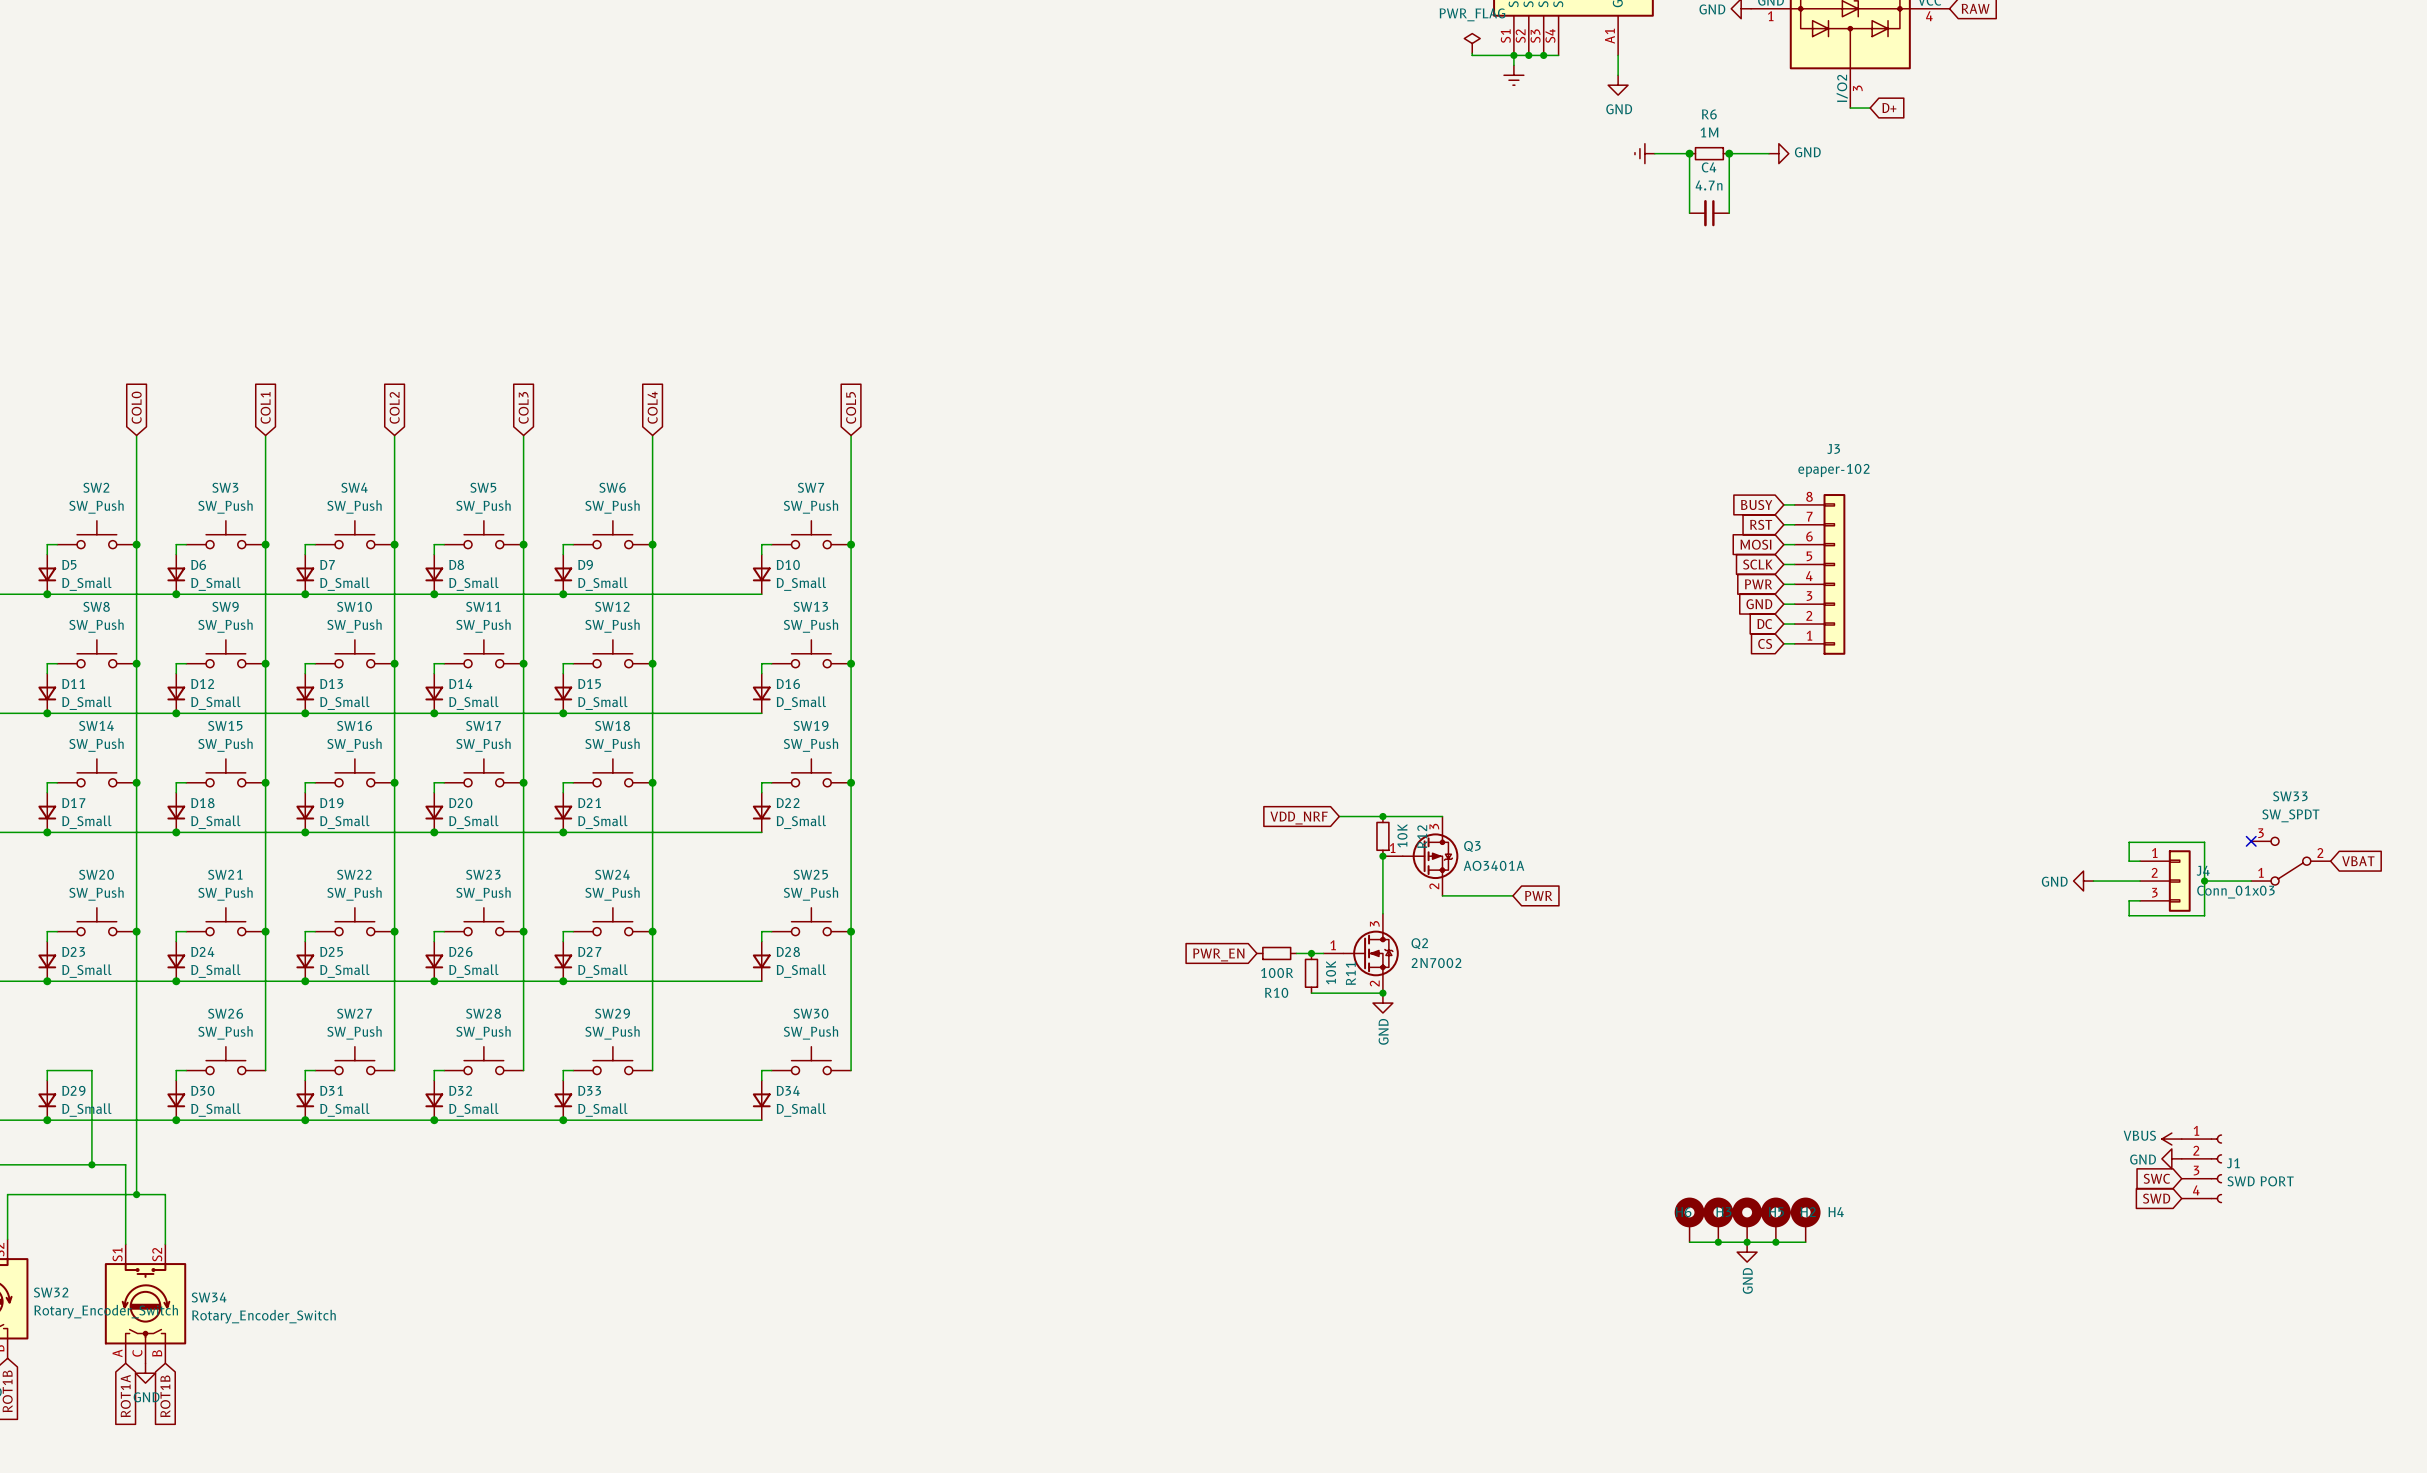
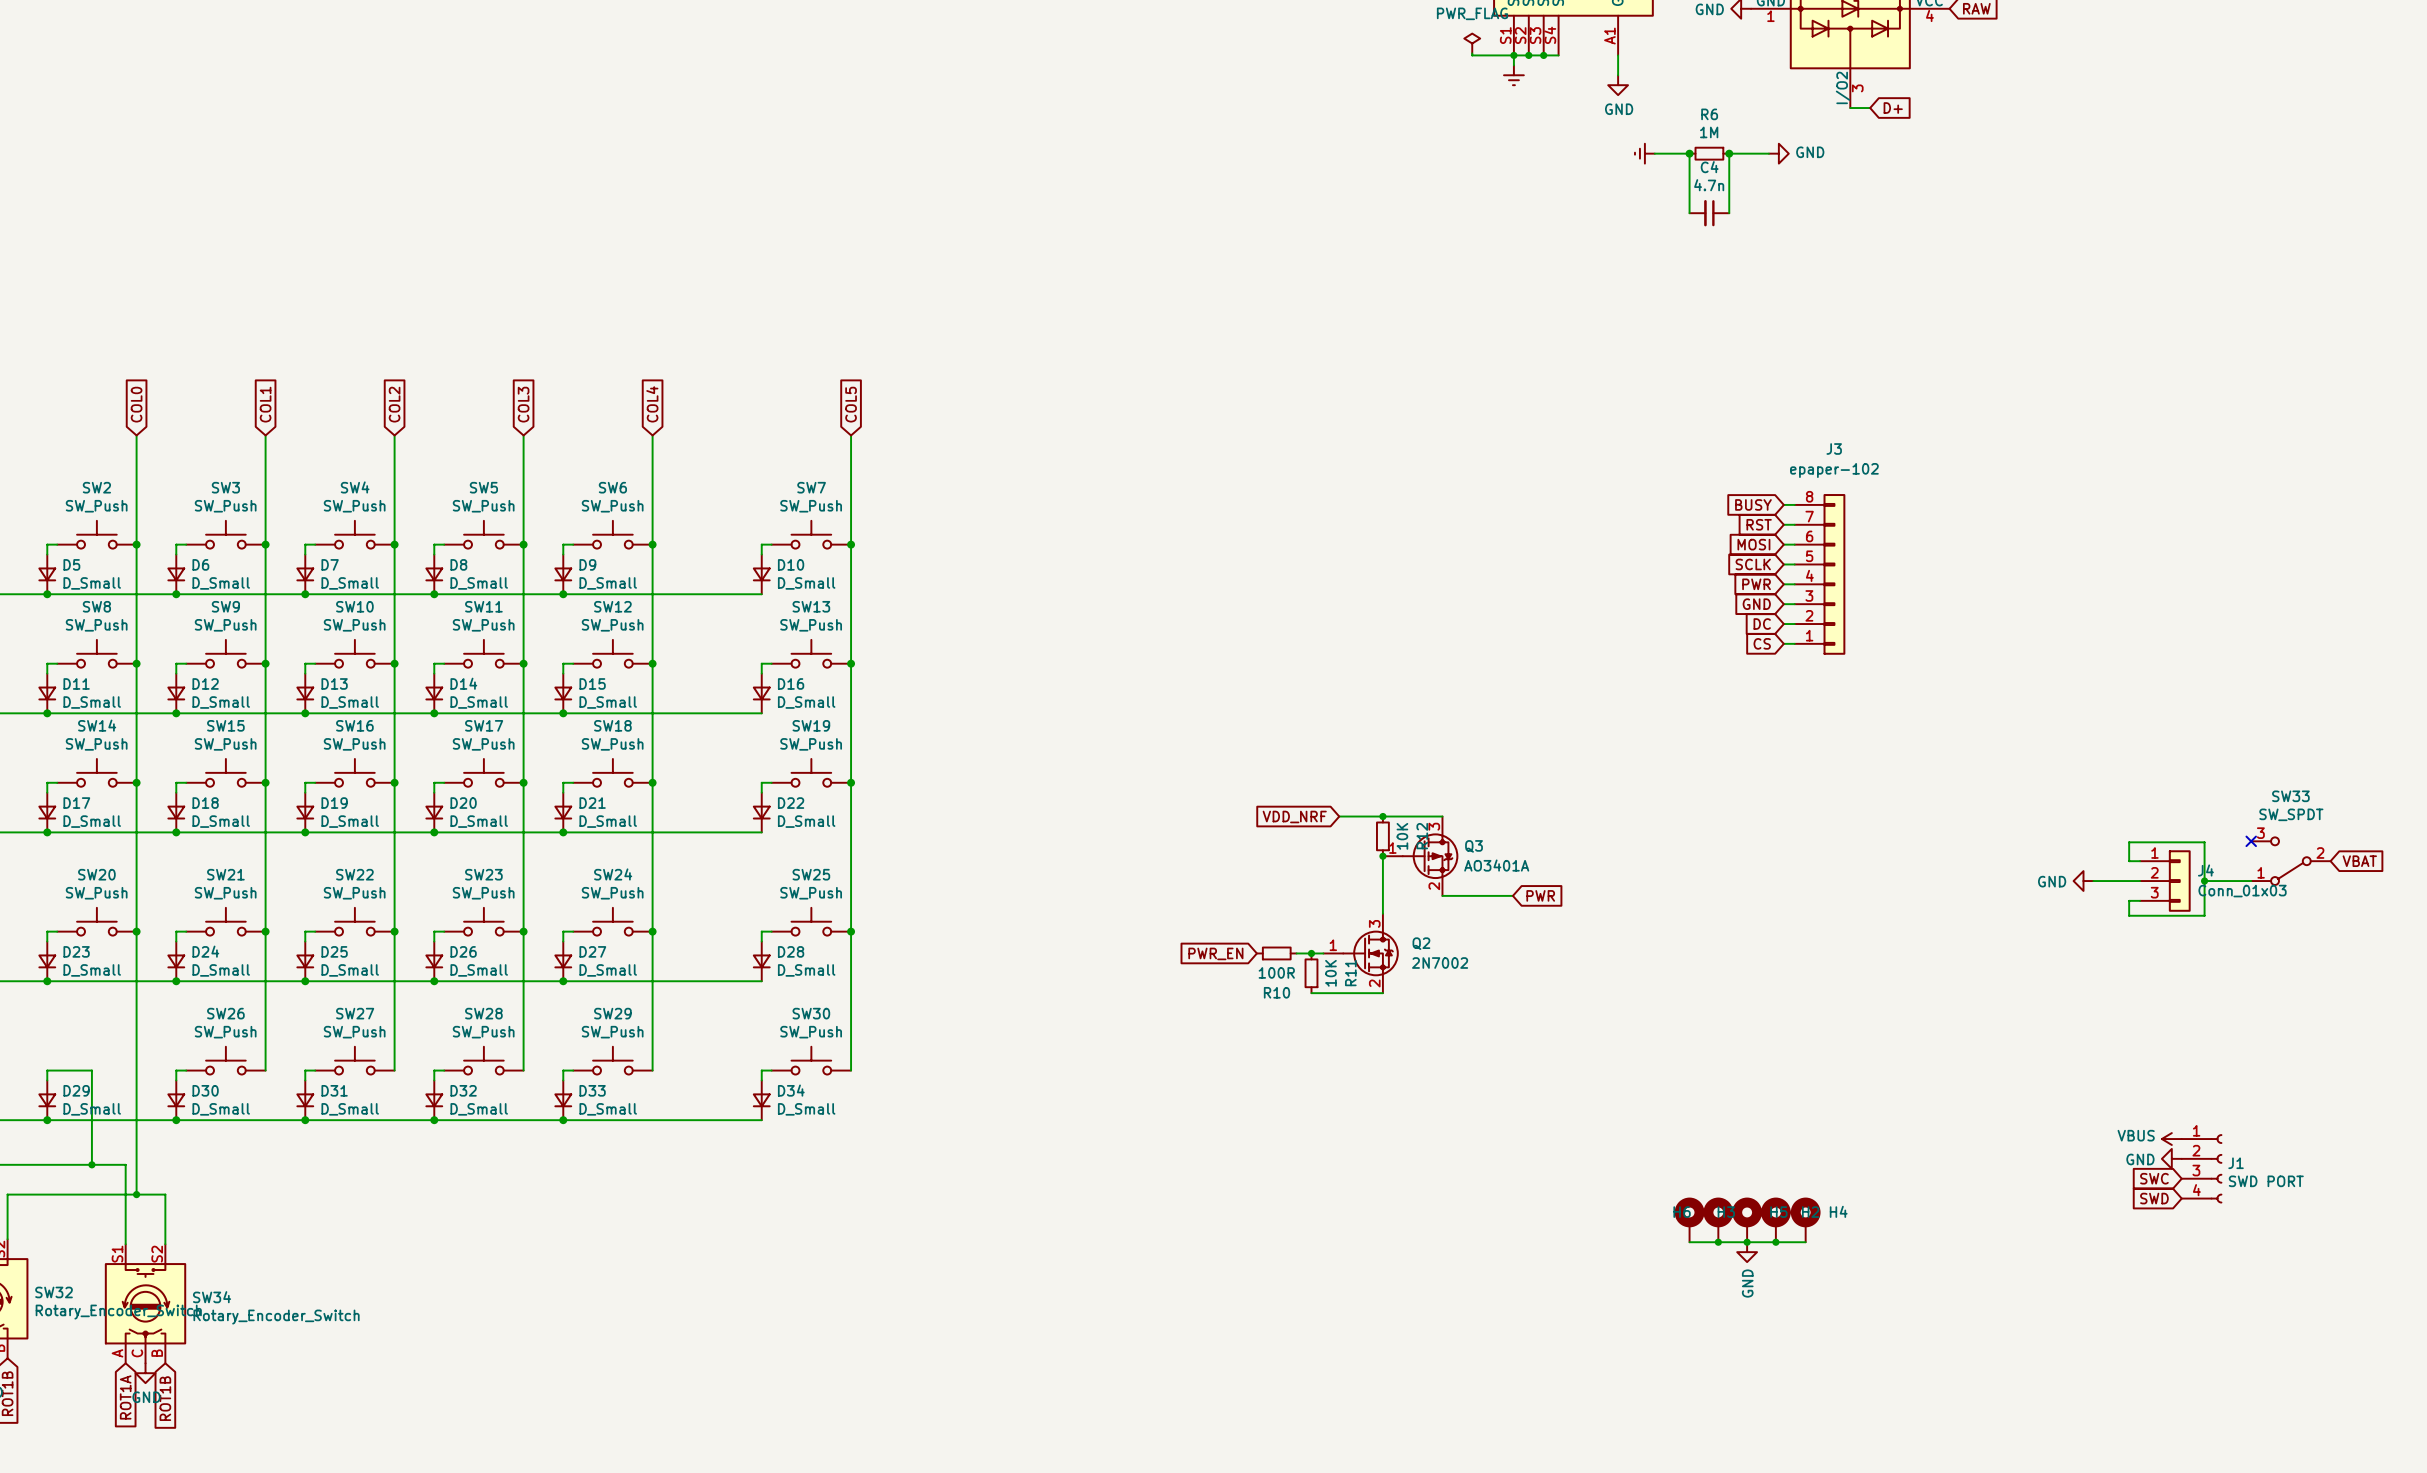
junction: (1382, 993) -> none
power symbol: GND (1382, 1003) -> none

